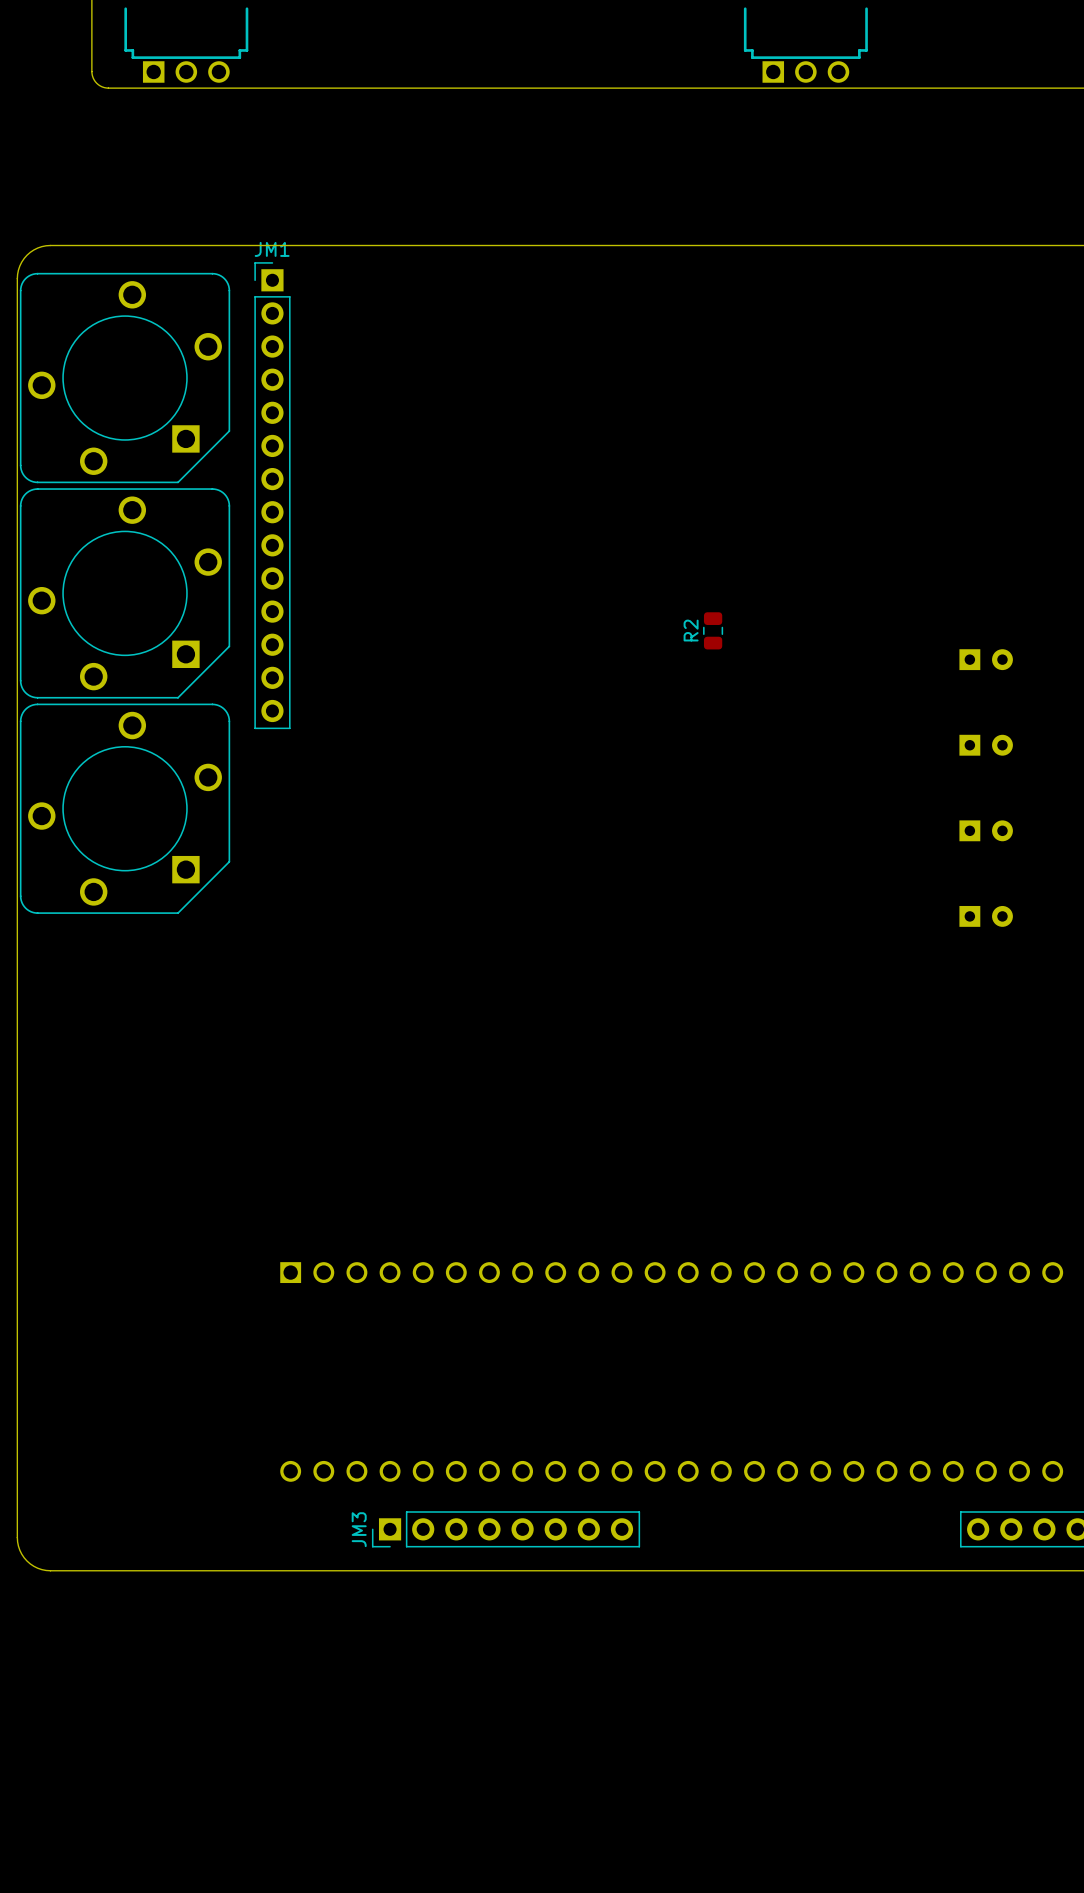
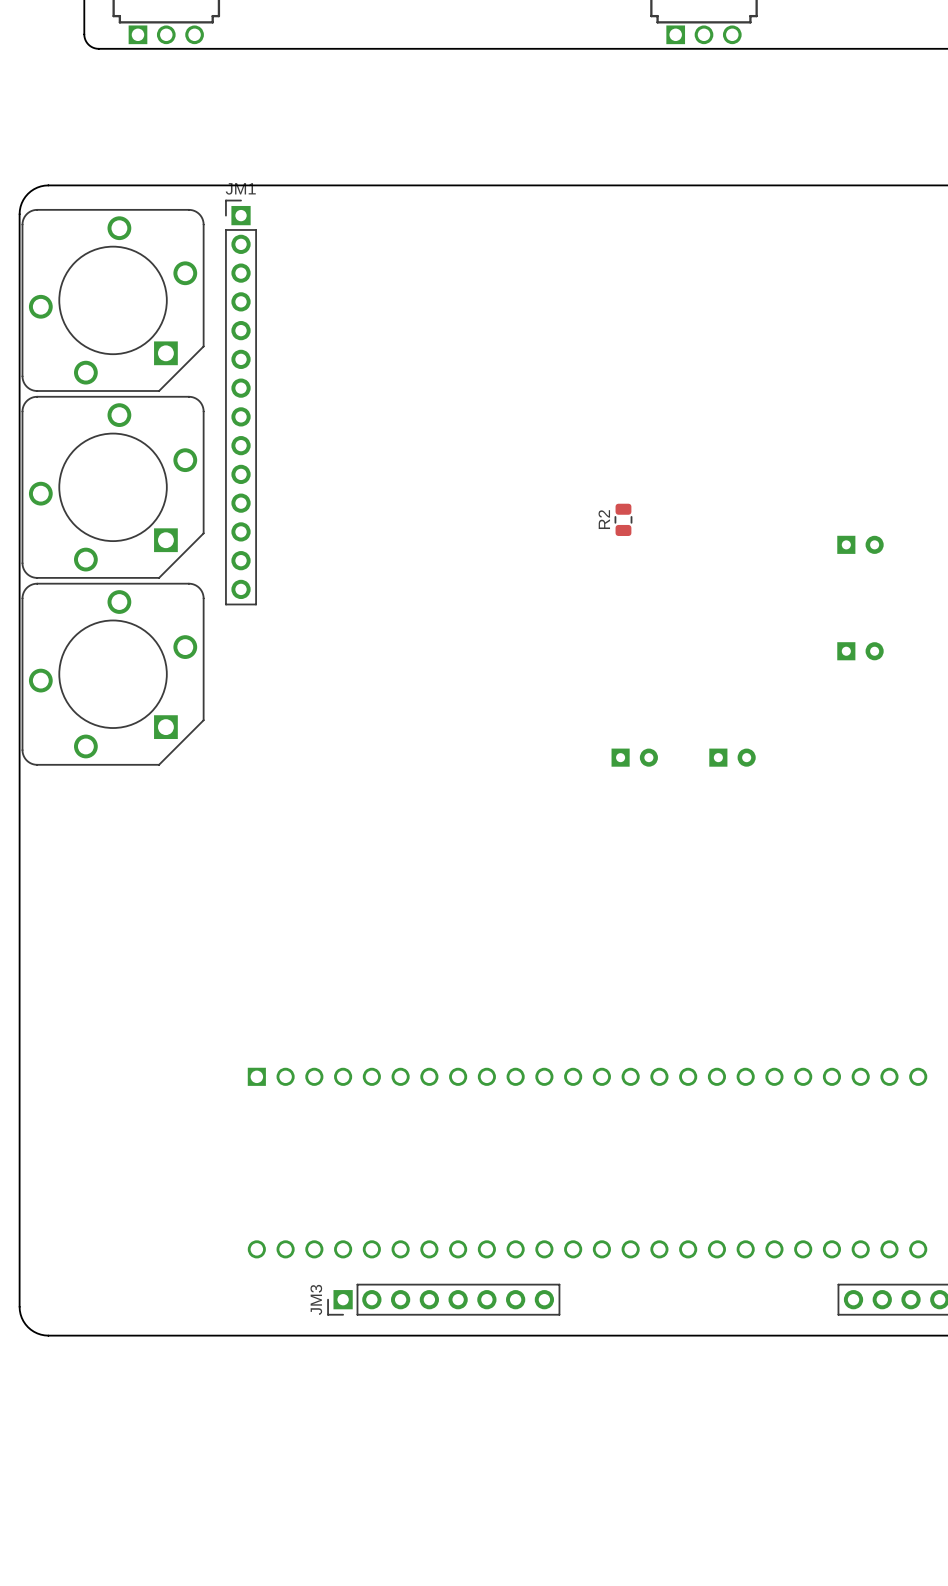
part: (986, 745) -> none
part: none -> (860, 651)
part: (986, 830) -> none
part: none -> (634, 757)
part: none -> (732, 757)
part: (986, 916) -> none

